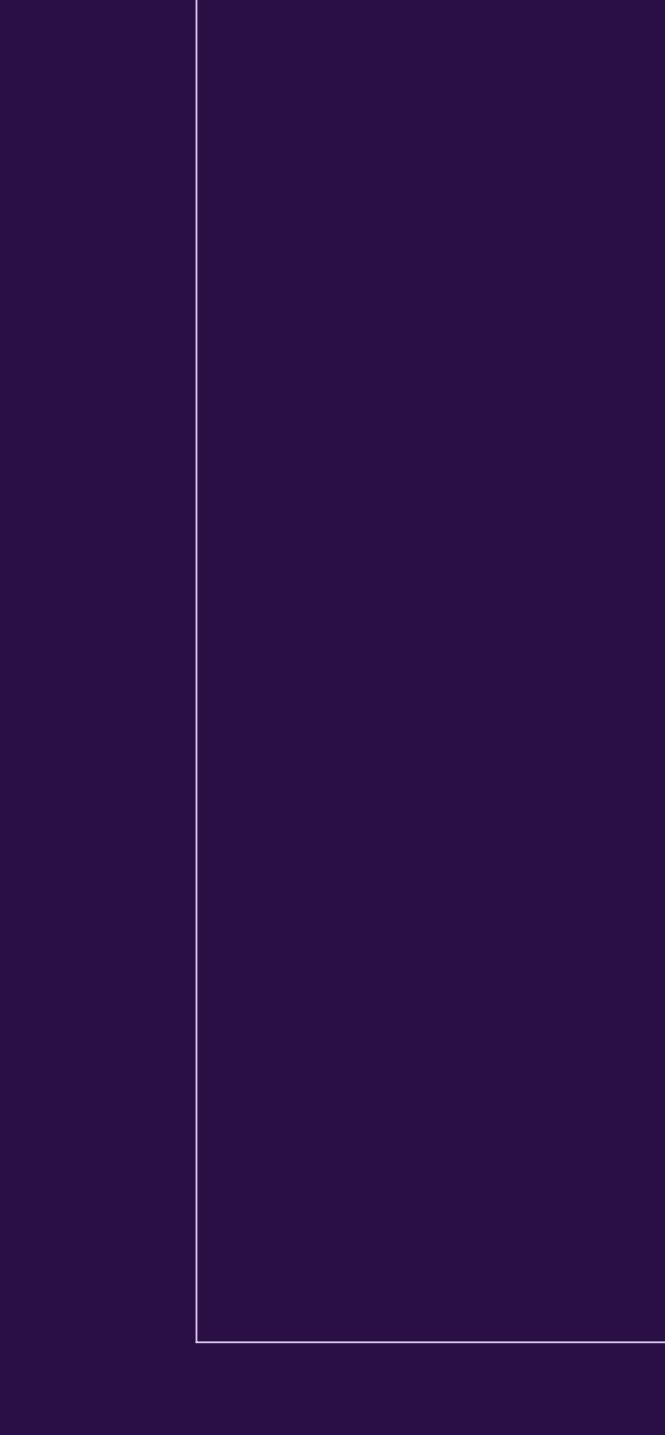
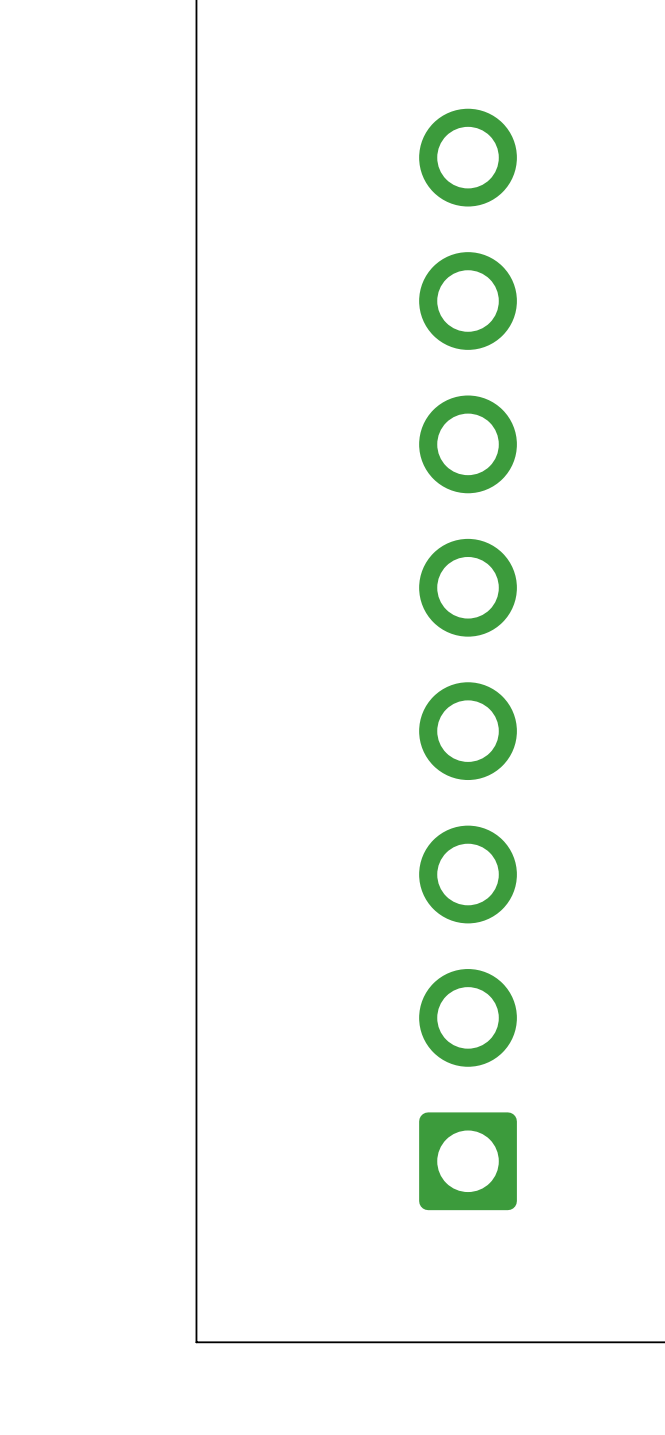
part: none -> (468, 659)

